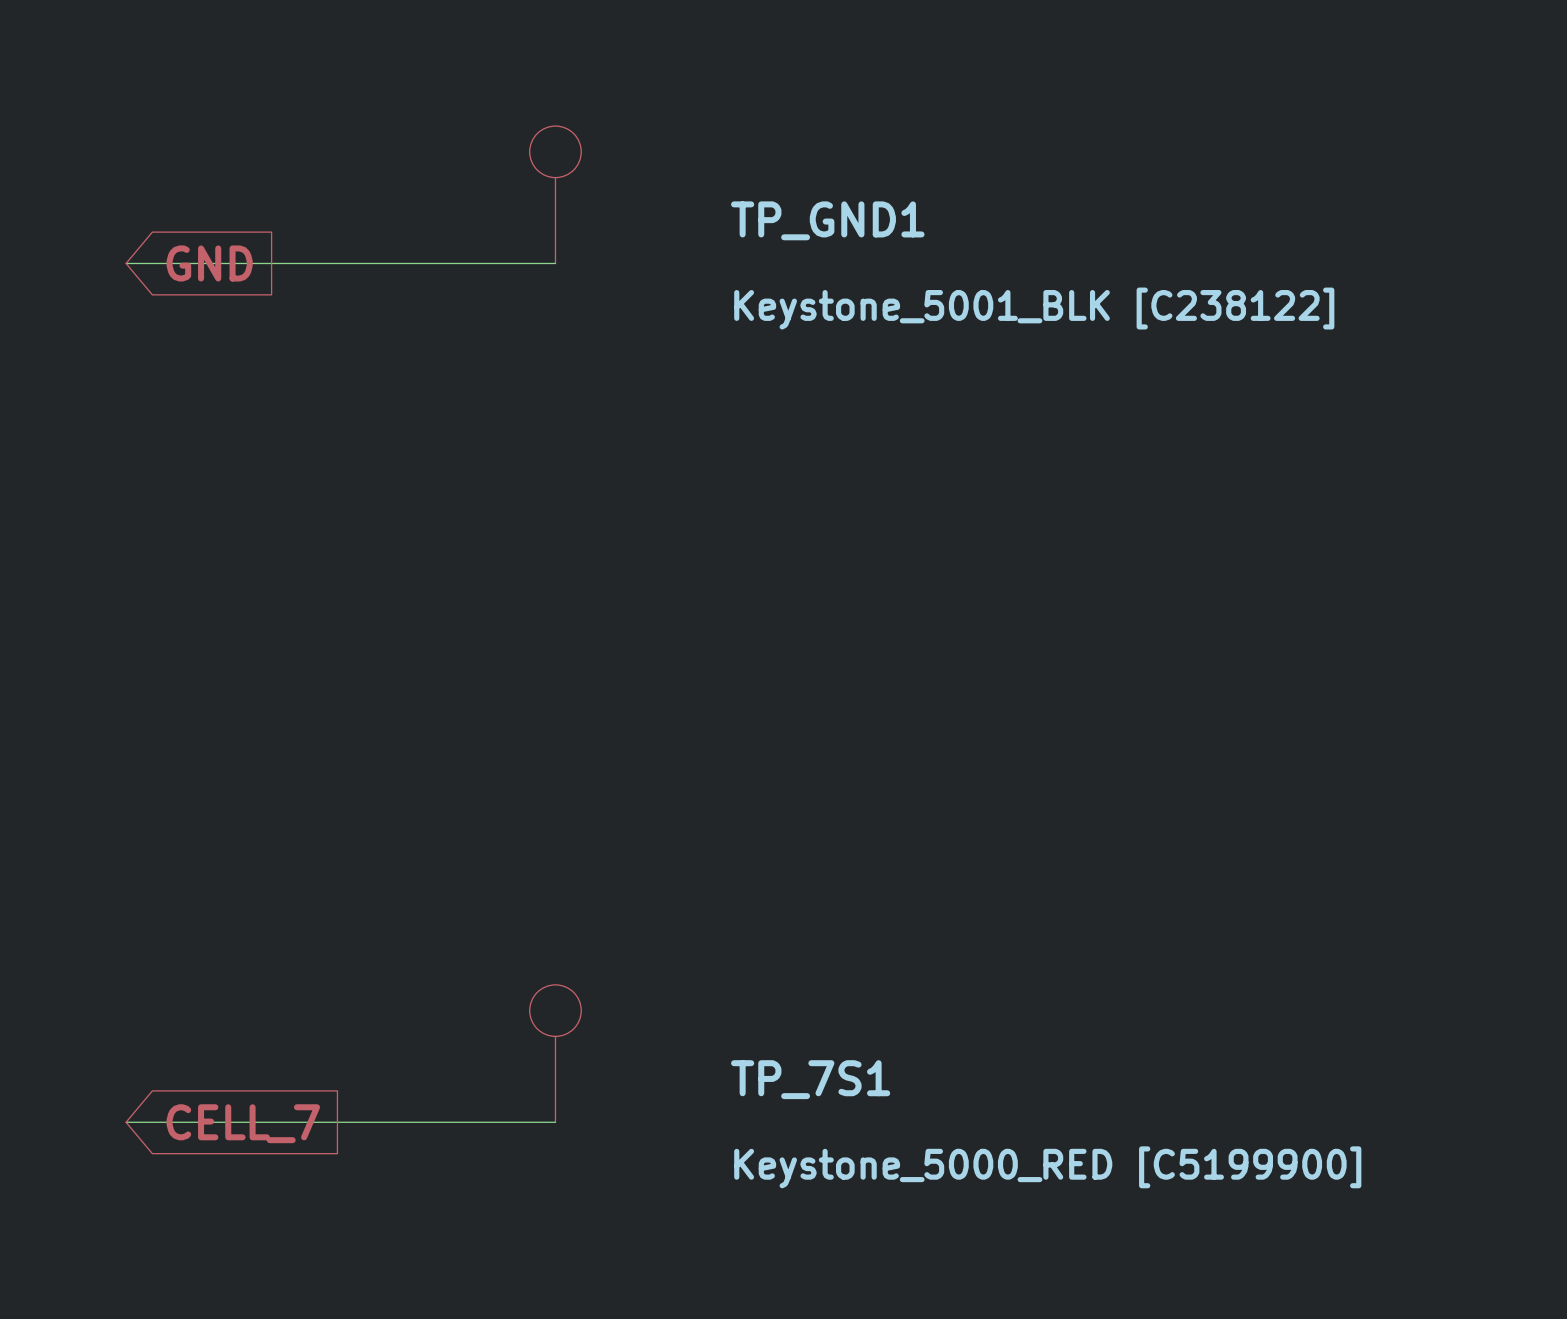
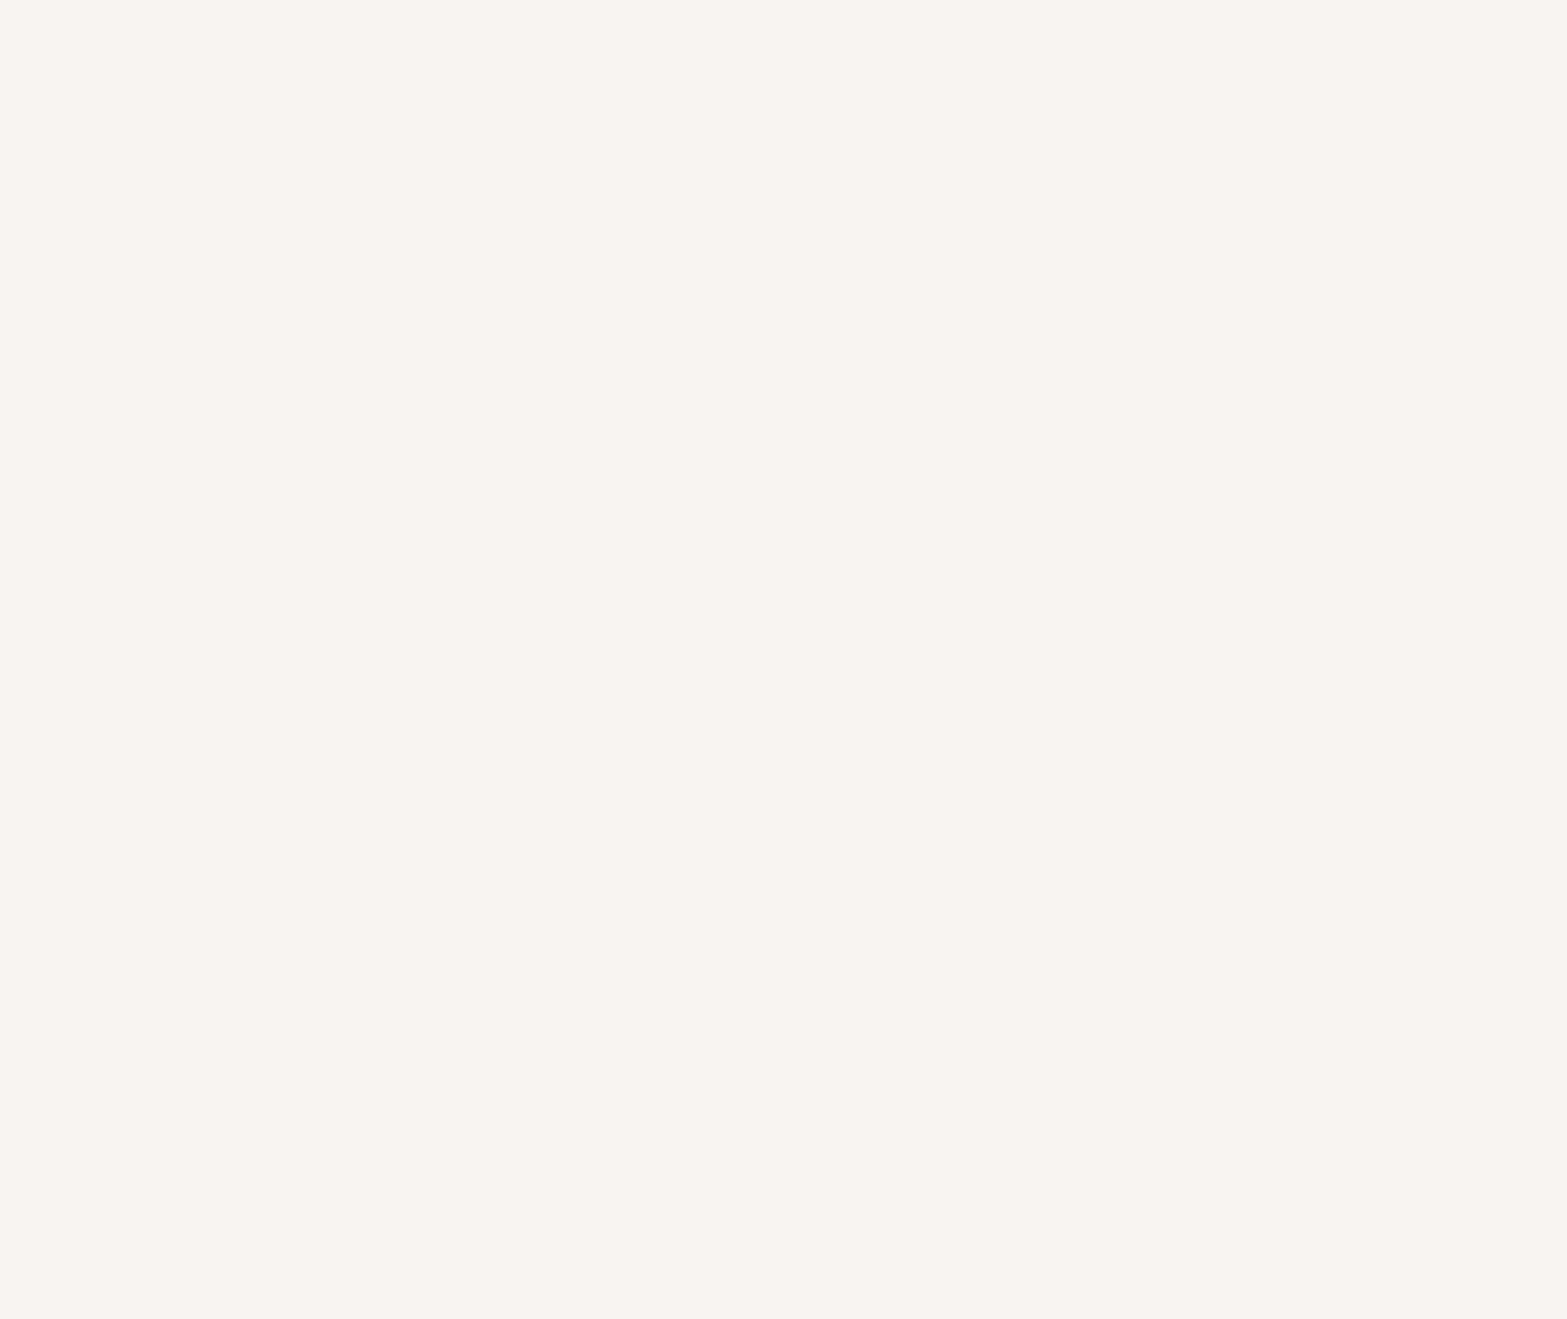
TP_GND1: Keystone_5001_BLK [C238122] (555, 194) -> none
wire: (126, 263) (555, 263) -> none
global label: GND (209, 263) -> none
TP_7S1: Keystone_5000_RED [C5199900] (555, 1053) -> none
wire: (126, 1122) (555, 1122) -> none
global label: CELL_7 (243, 1123) -> none

